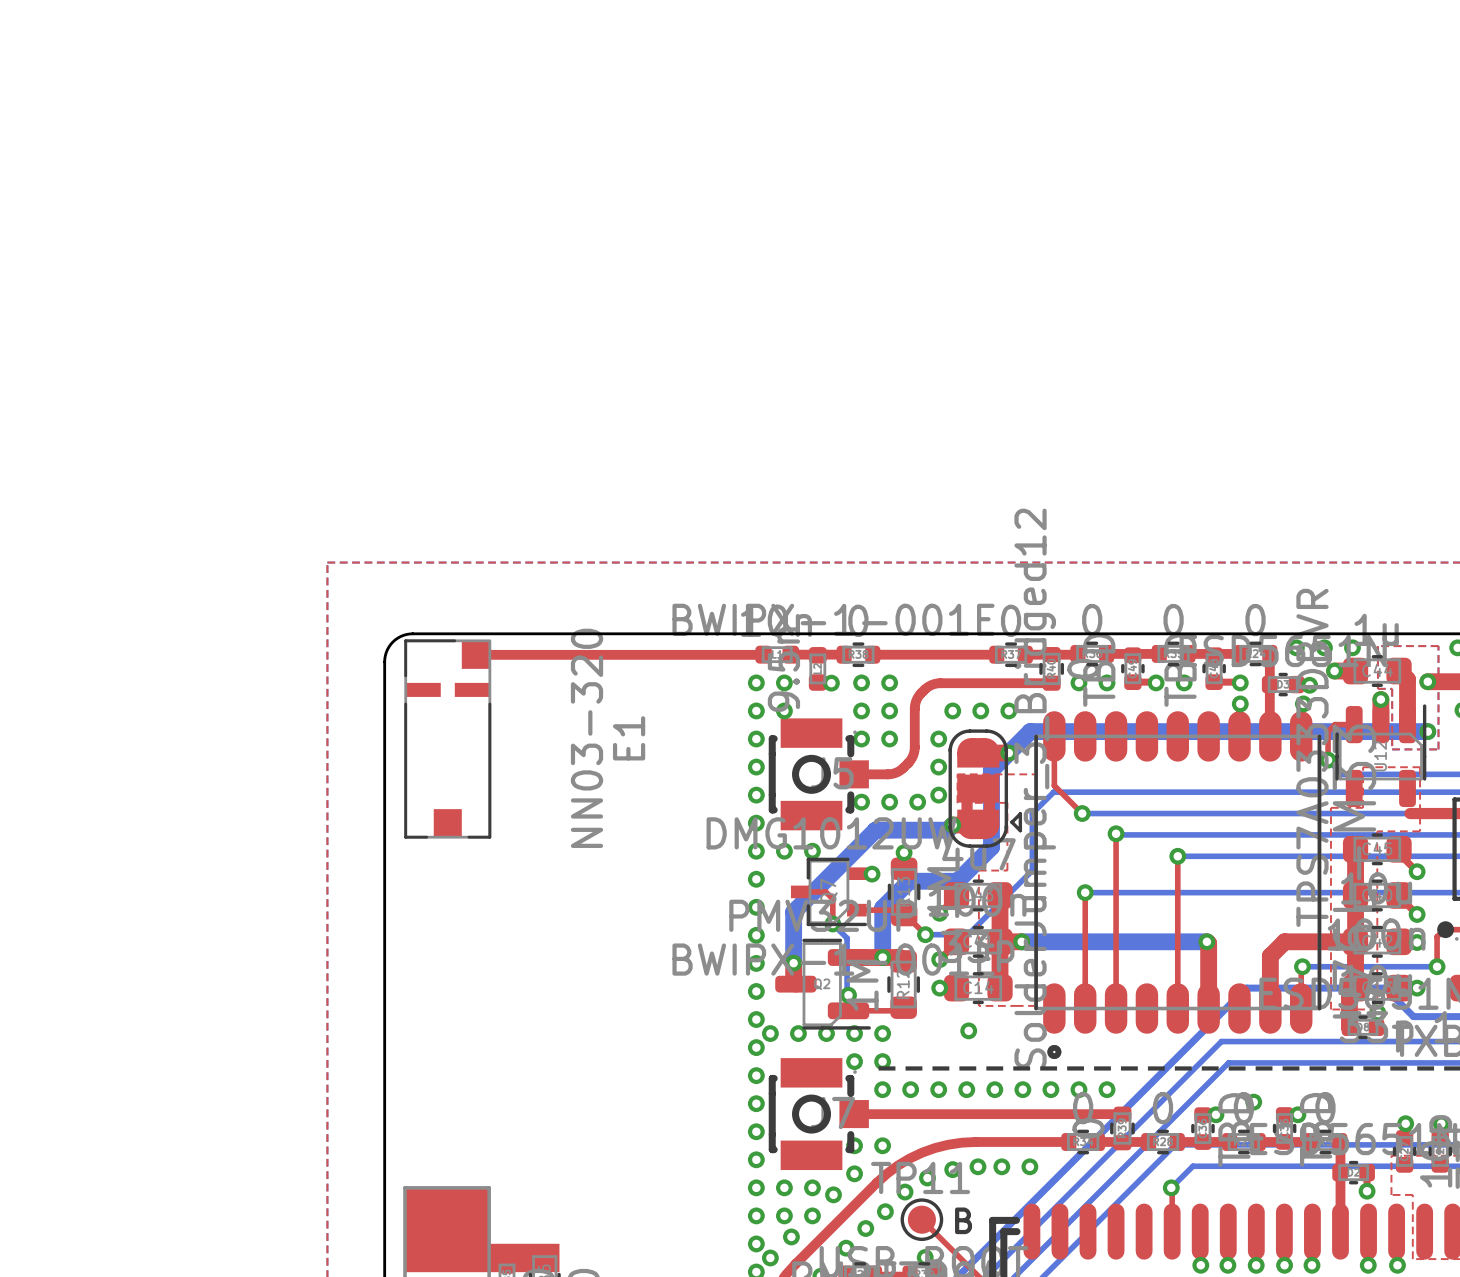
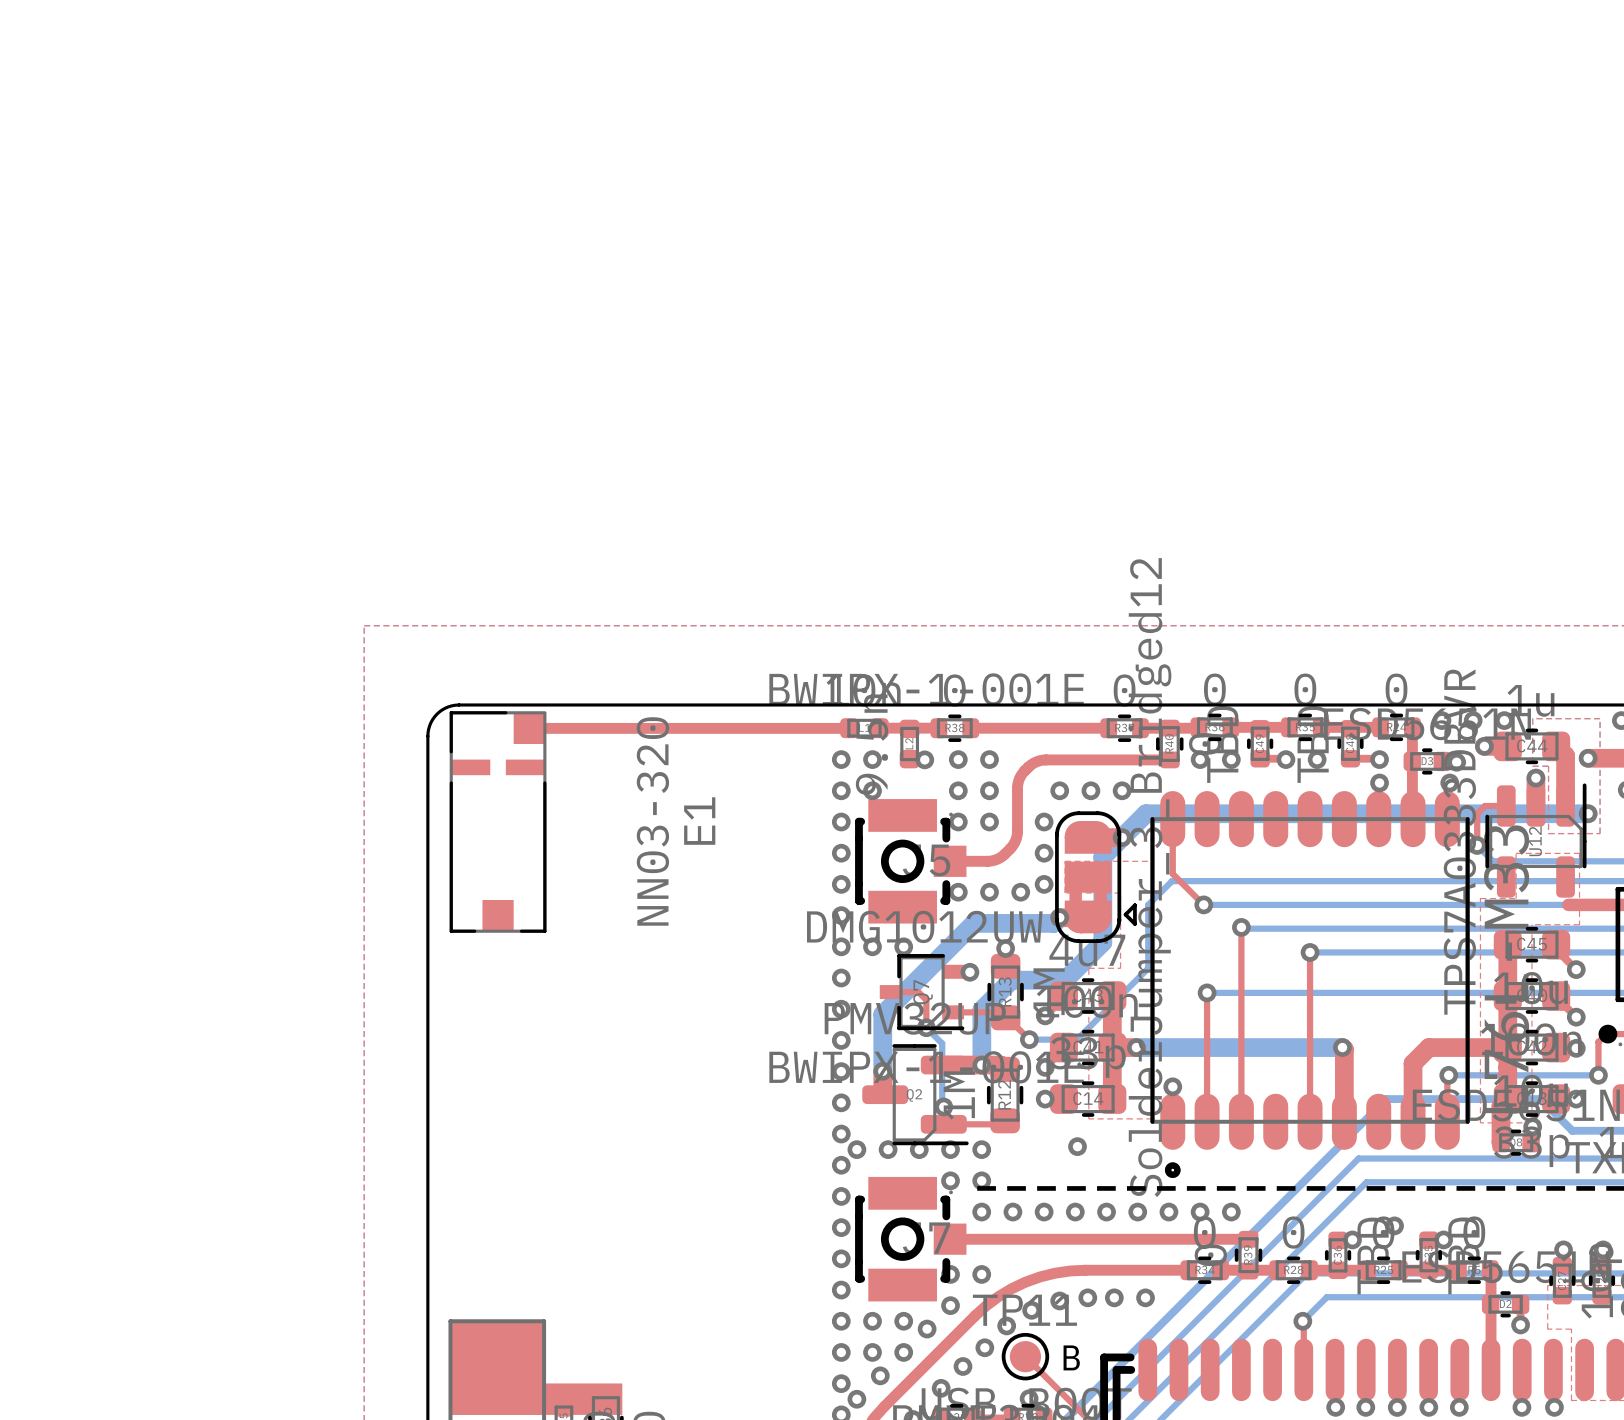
via: none -> (1172, 1086)

